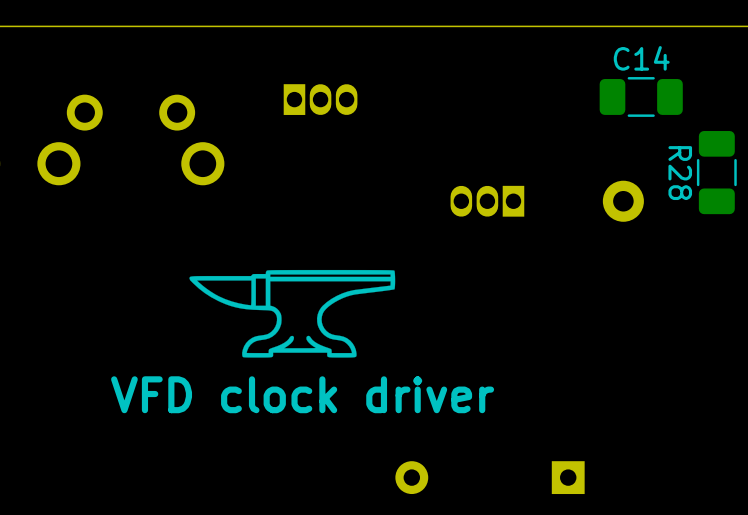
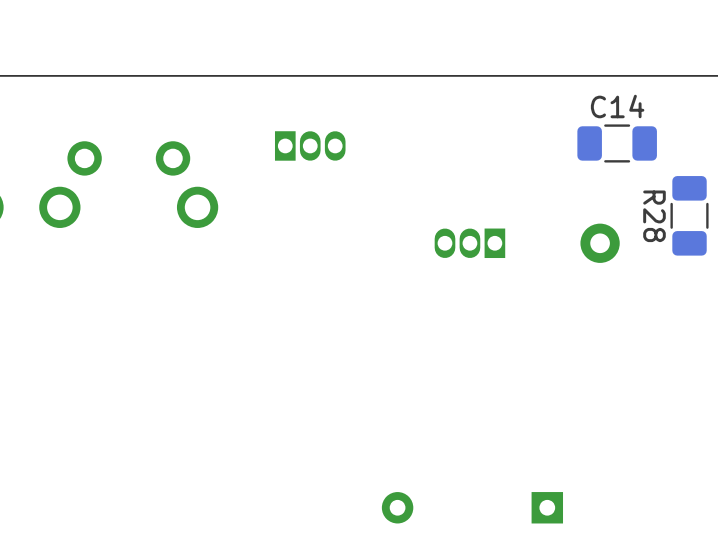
drawing: [189, 269, 396, 358] -> none
text: VFD clock driver (302, 394) -> none

